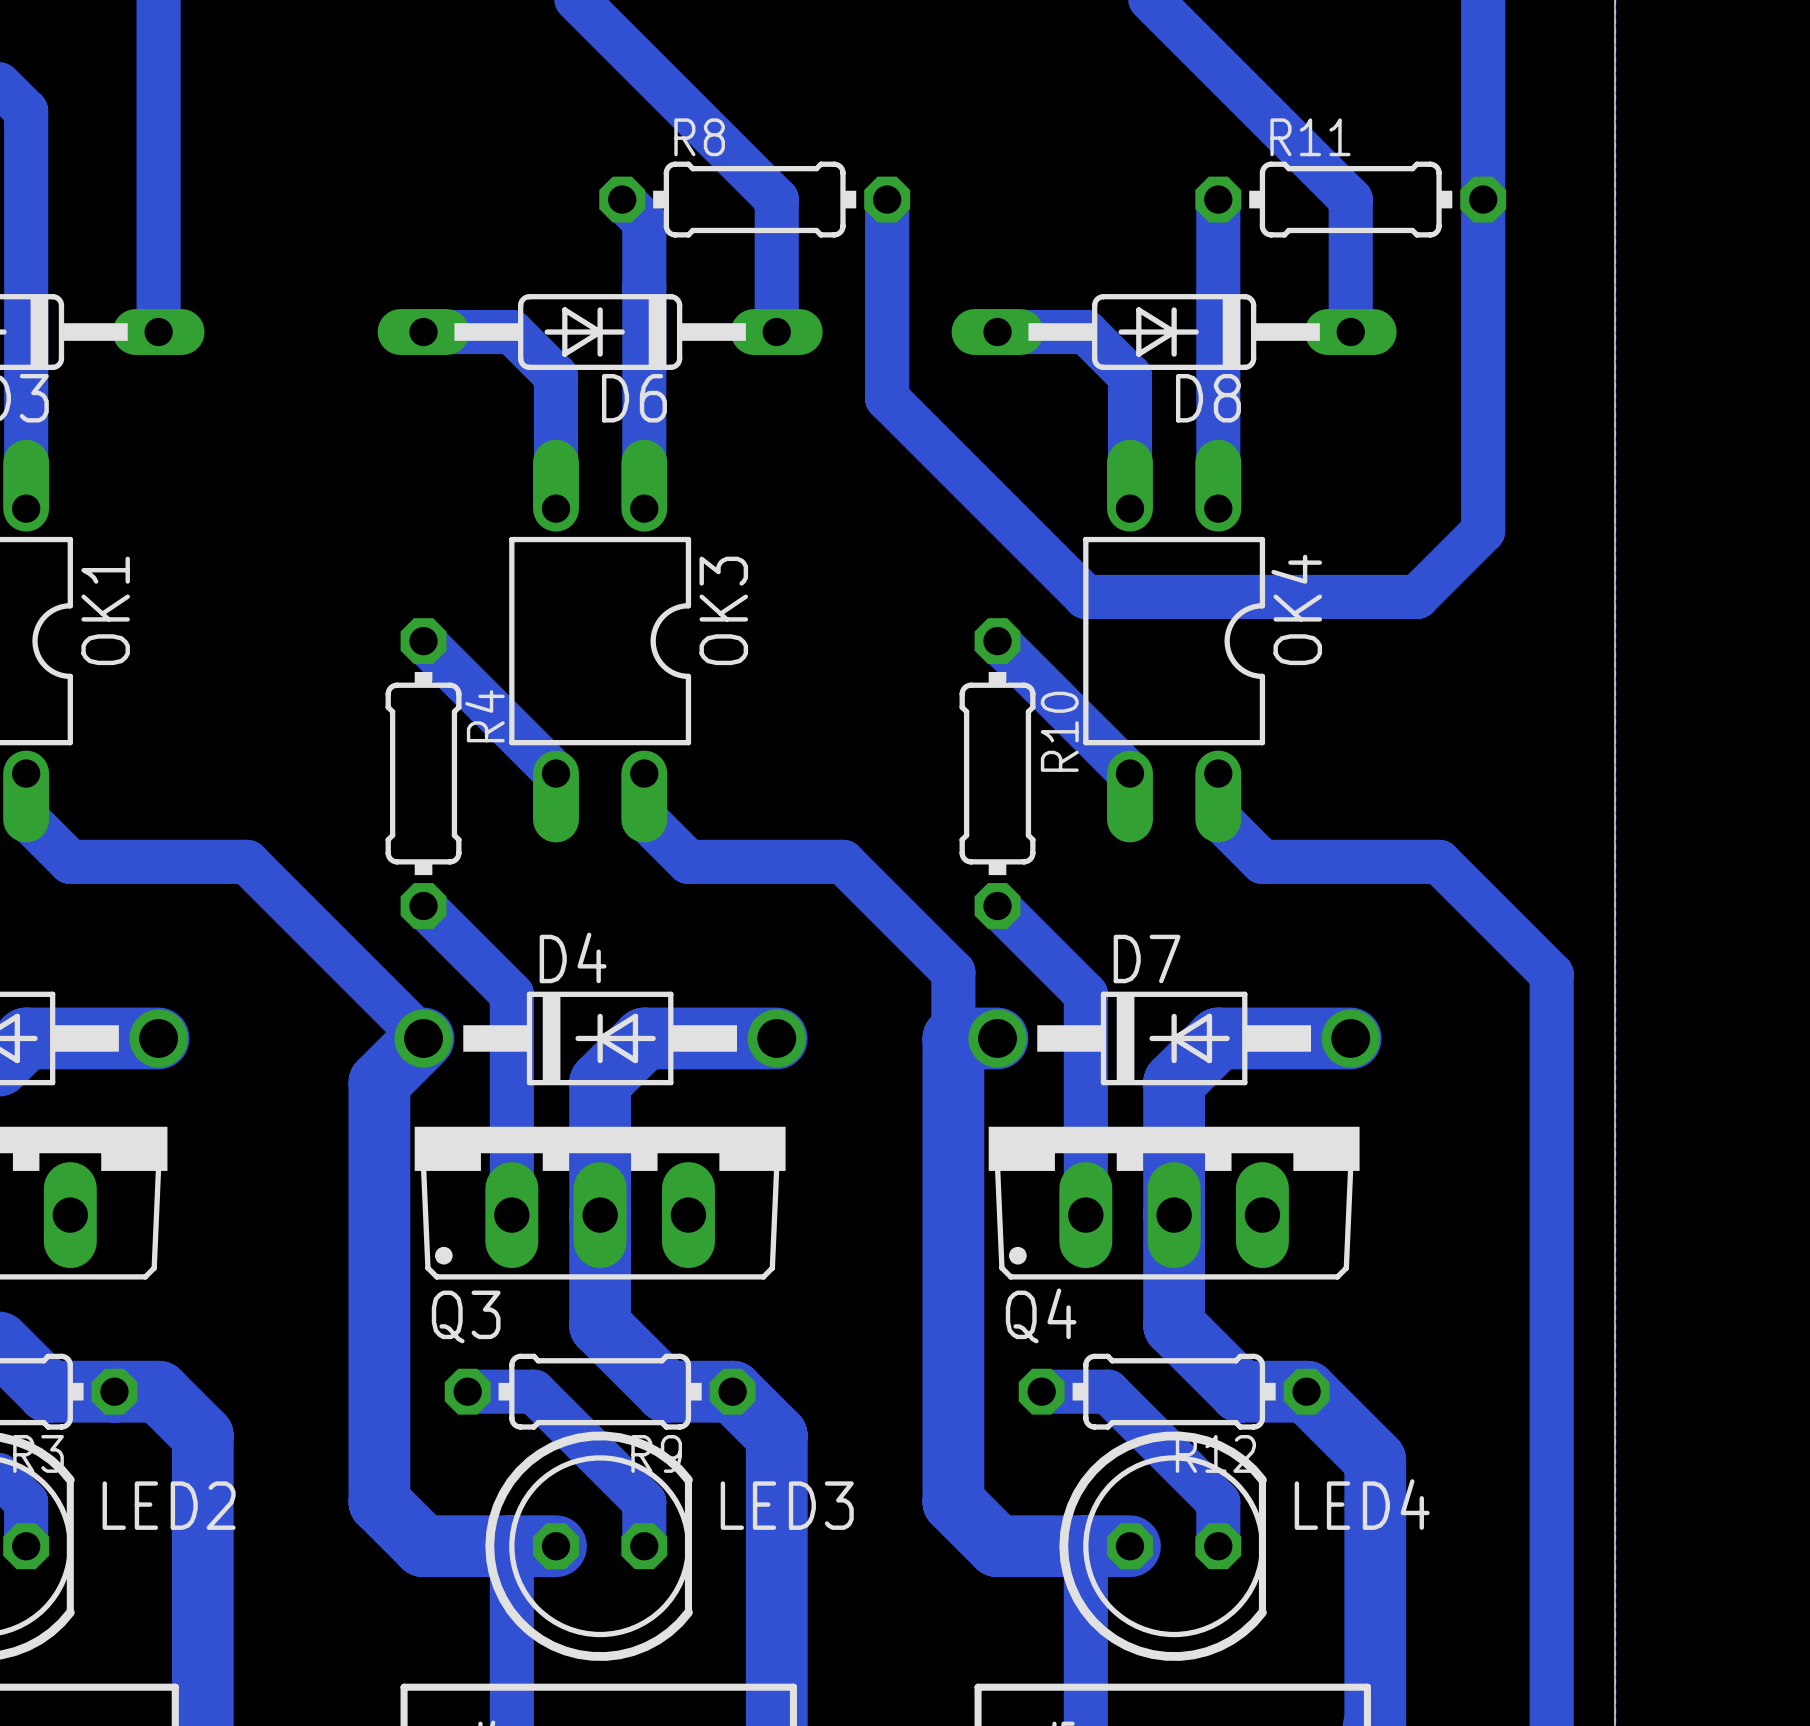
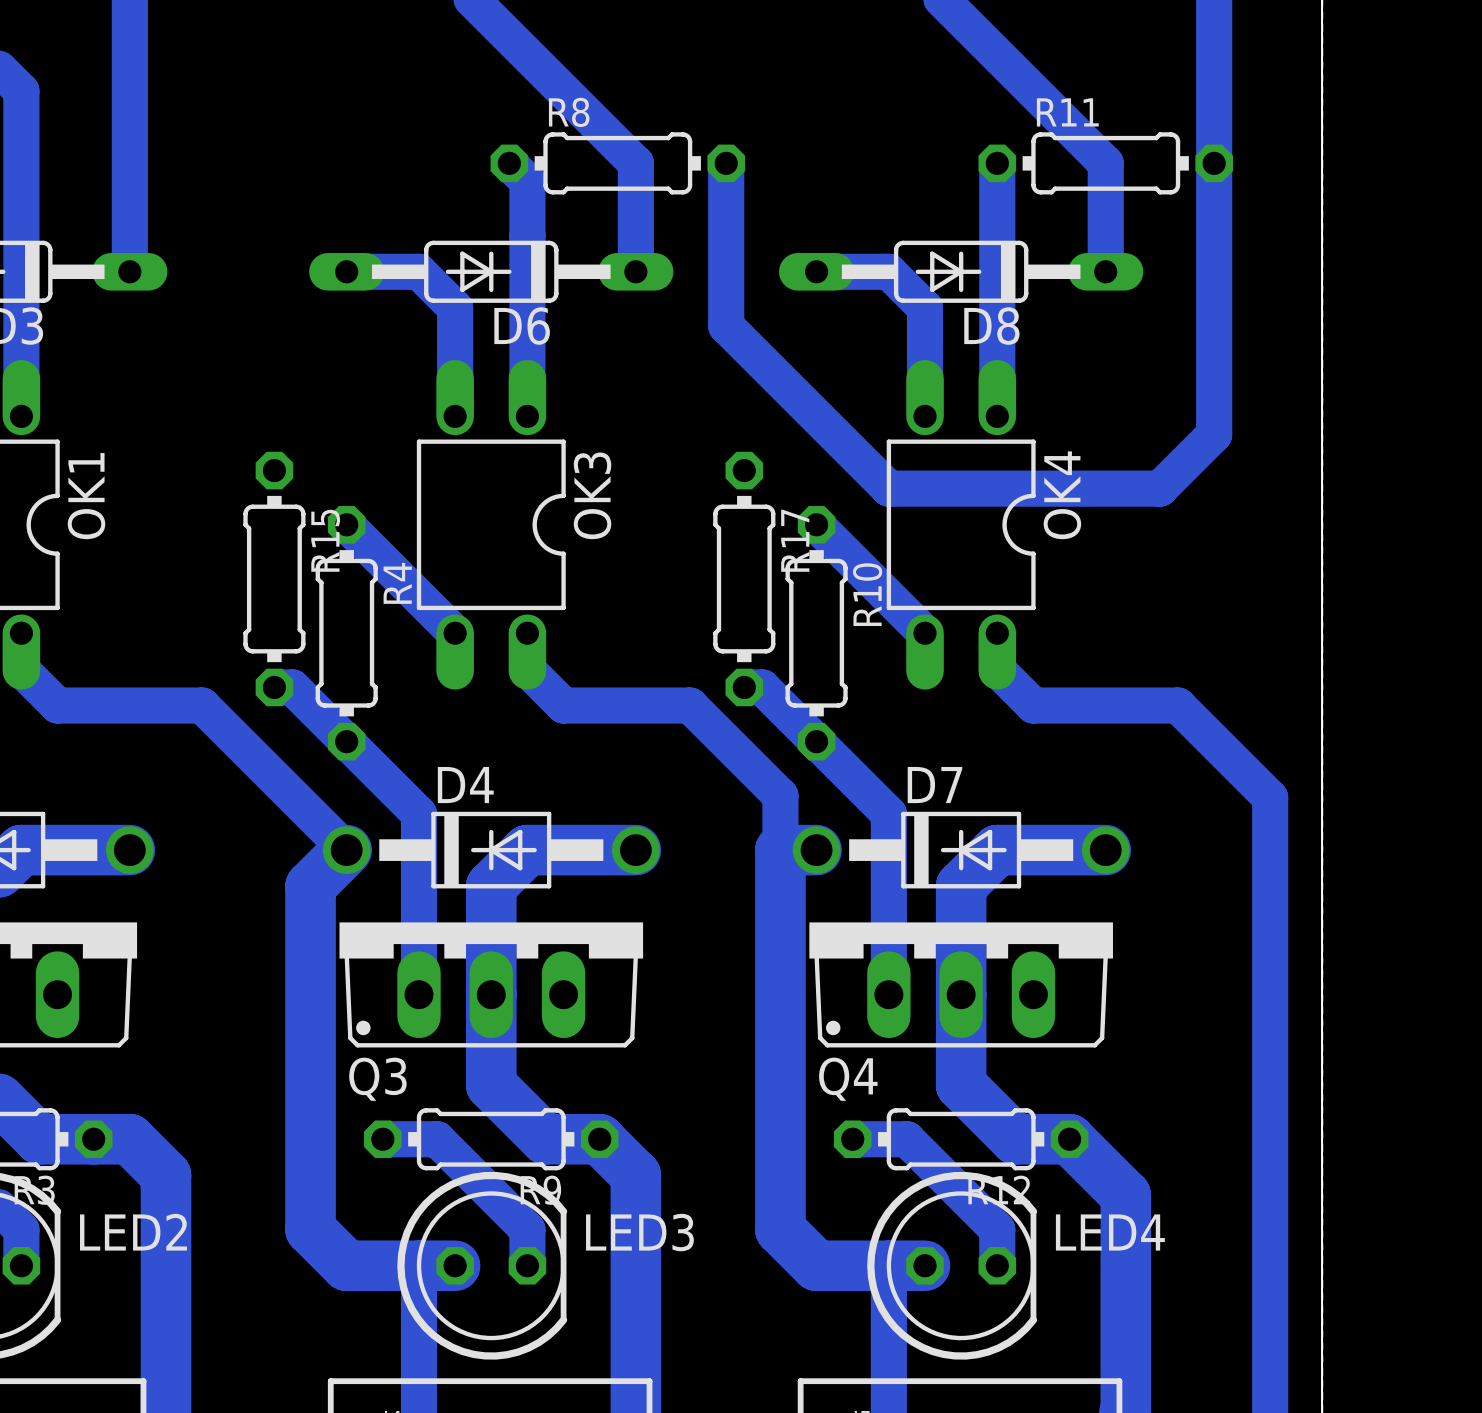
R15: none -> (274, 579)
R17: none -> (744, 579)
bottom track: none -> (274, 687) (292, 687) (346, 741)
bottom track: none -> (744, 687) (762, 687) (816, 741)

